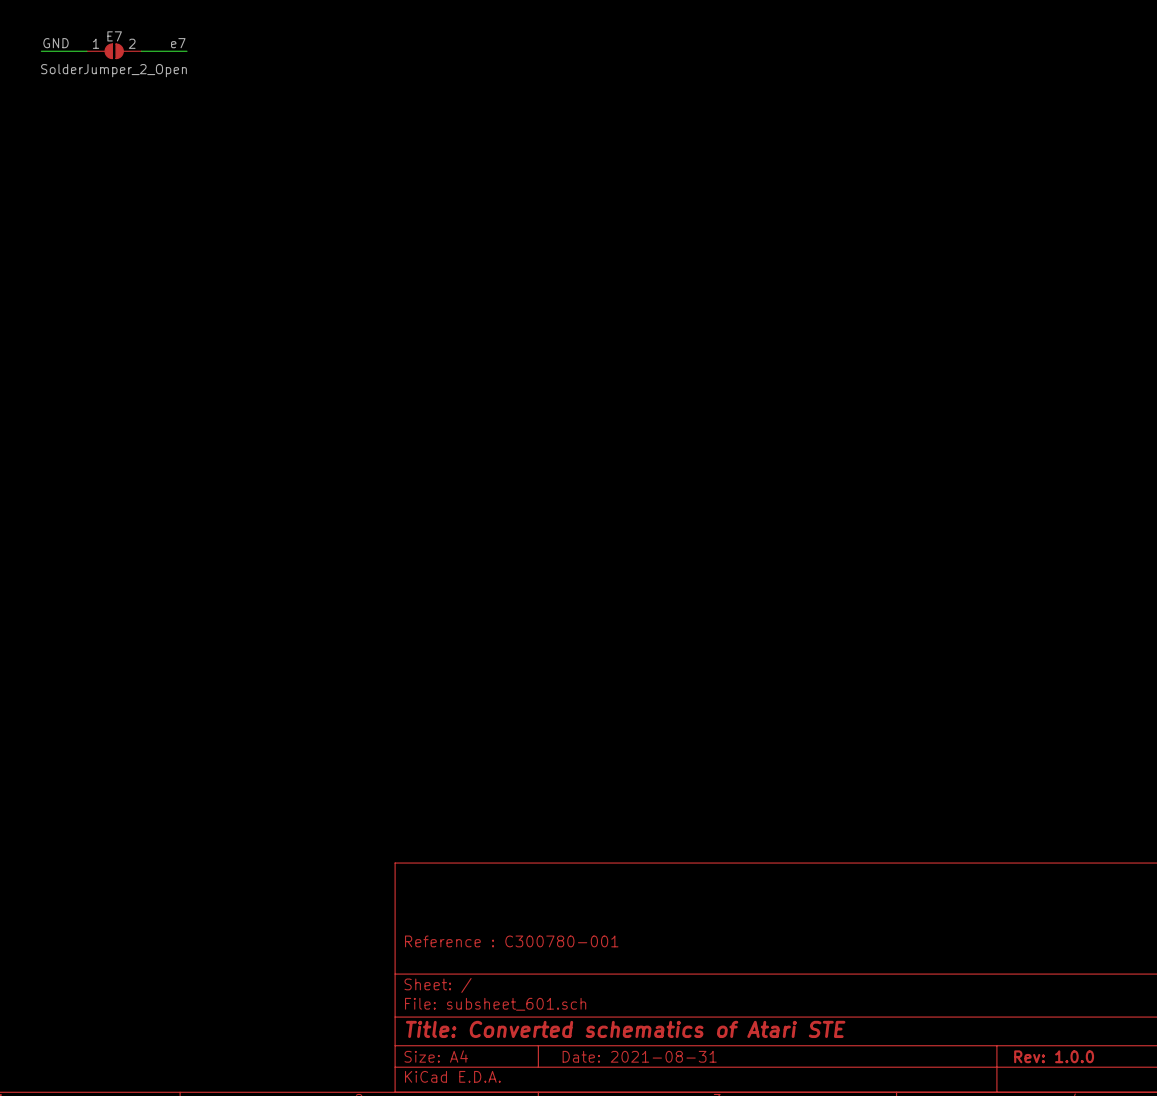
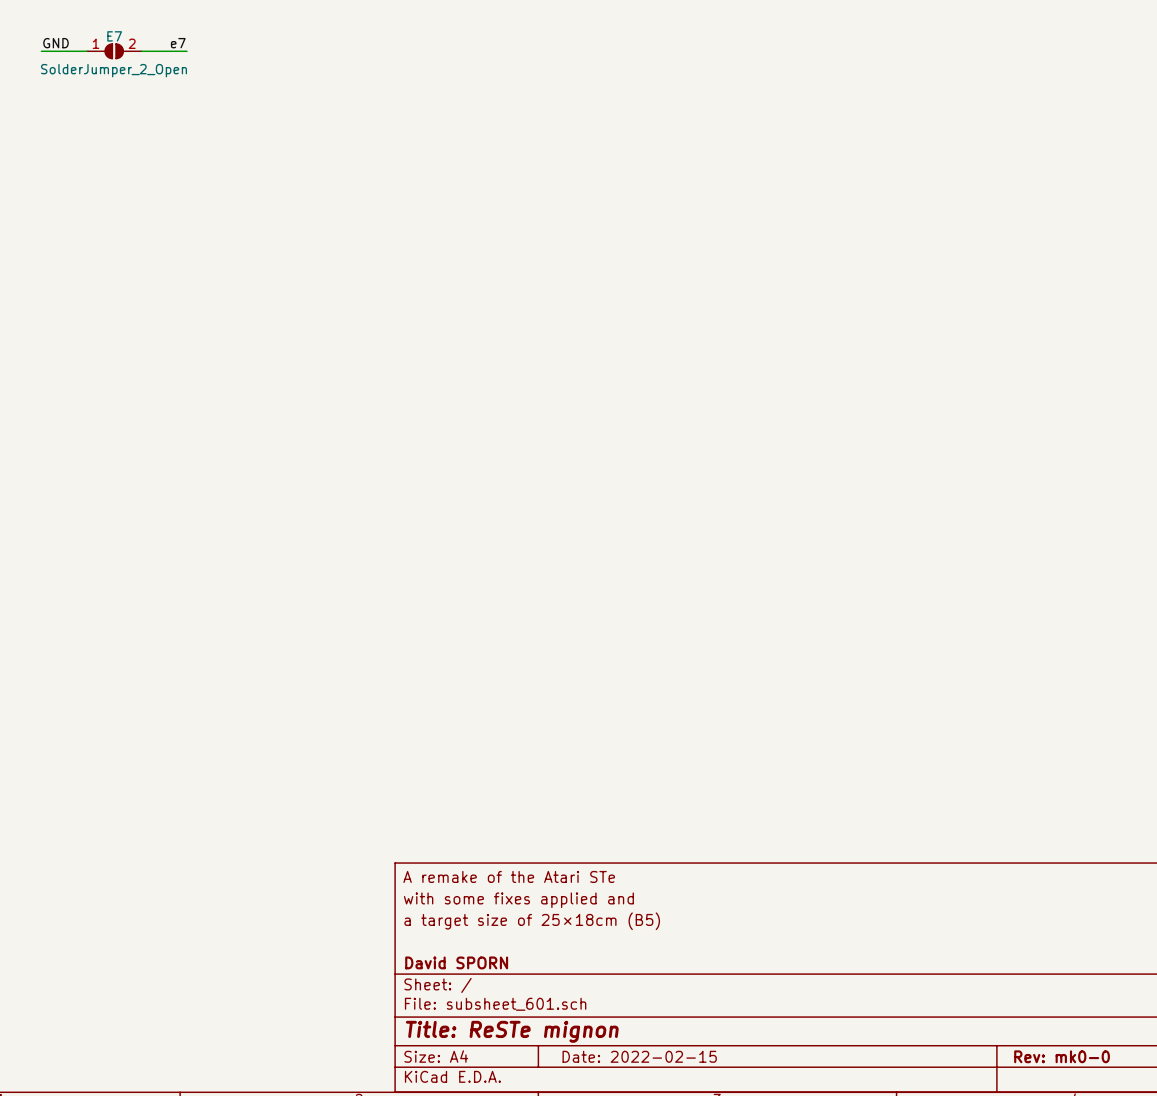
title block: none -> A remake of the Atari STe (509, 876)
title block: none -> with some fixes applied and (518, 900)
title block: none -> a target size of 25×18cm (B5) (532, 921)
title block: Reference : C300780-001 (511, 941) -> none
title block: none -> David SPORN (456, 962)
title block: Title: Converted schematics of Atari STE (625, 1029) -> Title: ReSTe mignon (512, 1031)
title block: Date: 2021-08-31 (639, 1056) -> Date: 2022-02-15 (639, 1056)
title block: Rev: 1.0.0 (1054, 1056) -> Rev: mk0-0 (1062, 1056)

